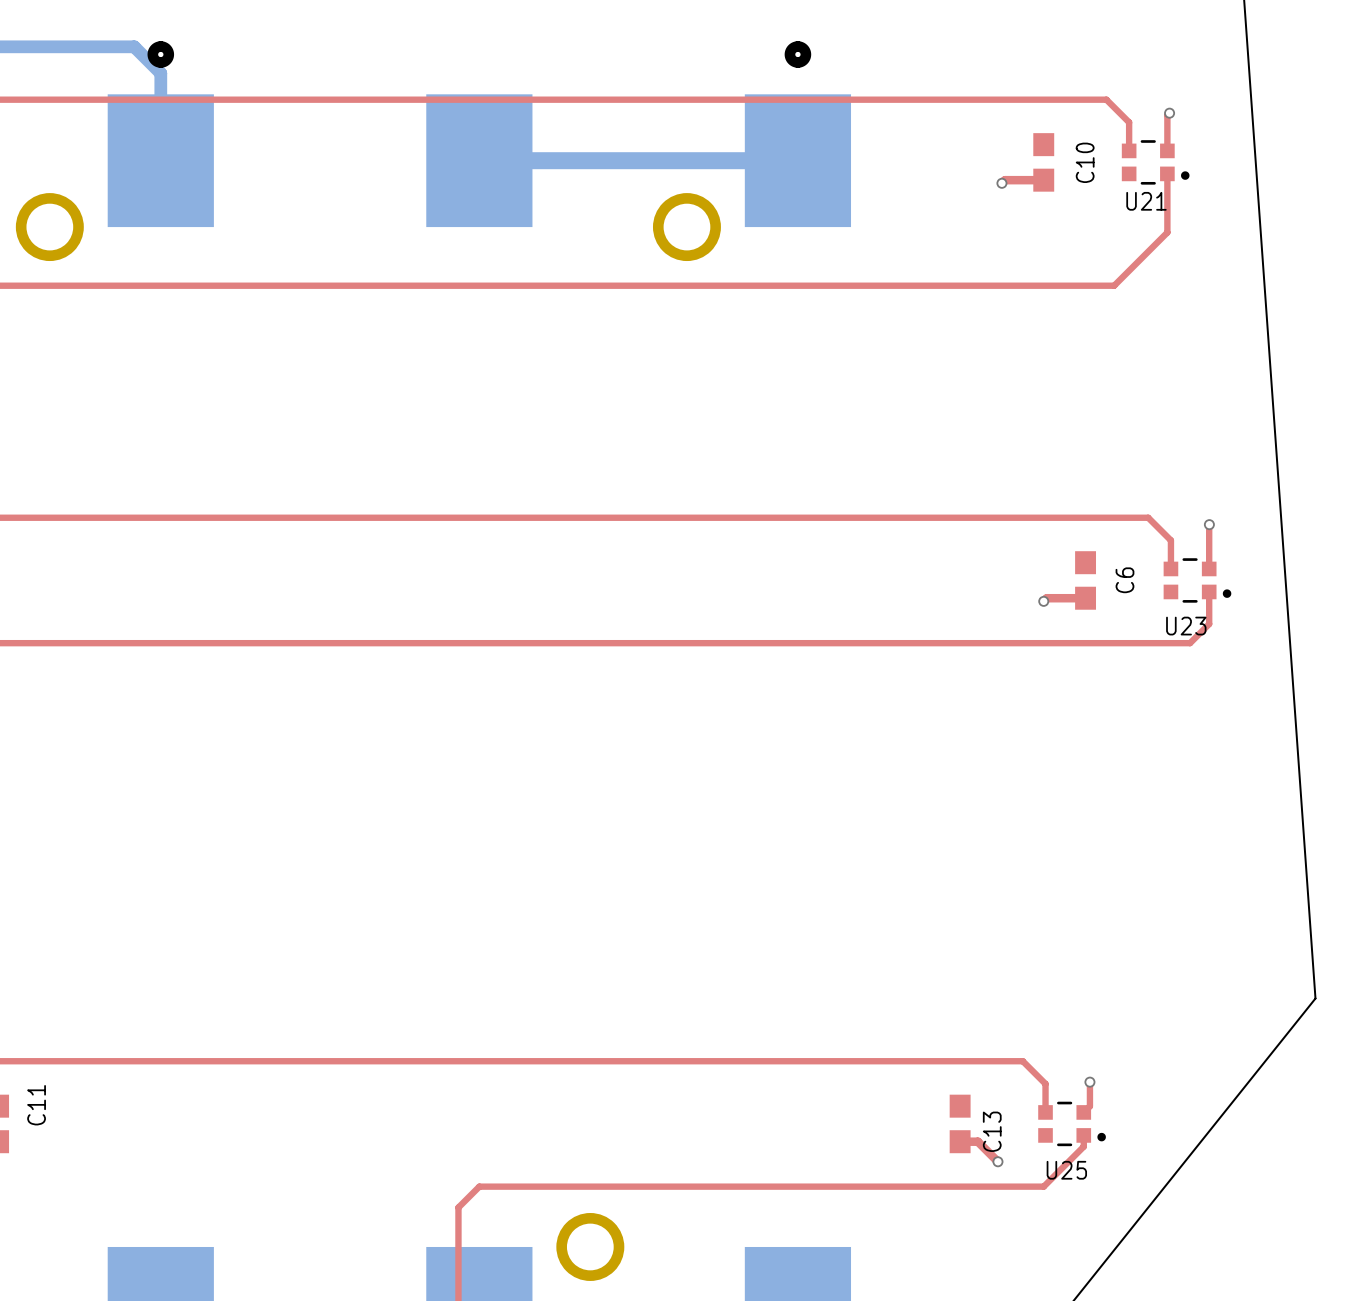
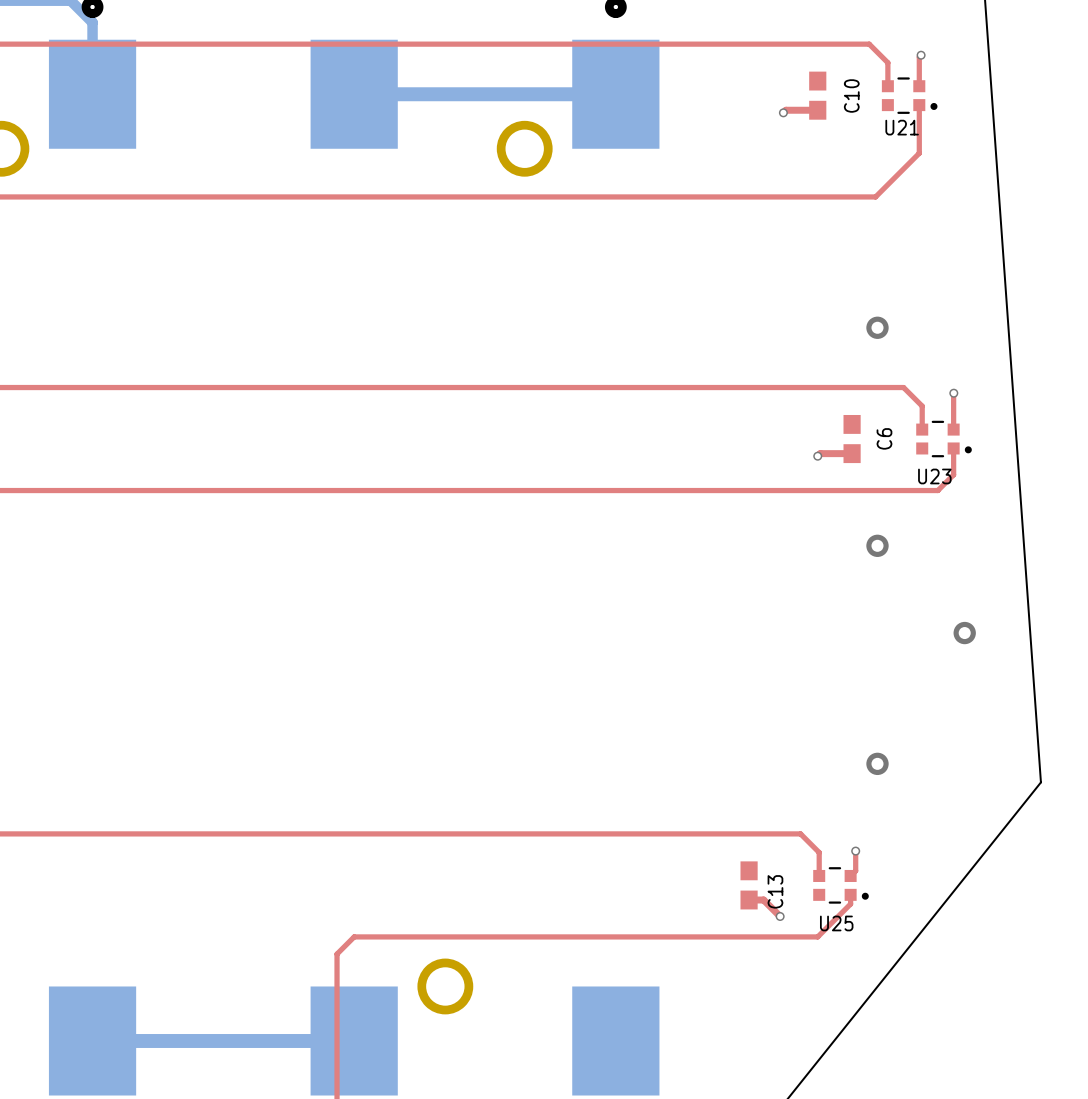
via: none -> (877, 327)
via: none -> (877, 545)
via: none -> (964, 633)
via: none -> (877, 763)

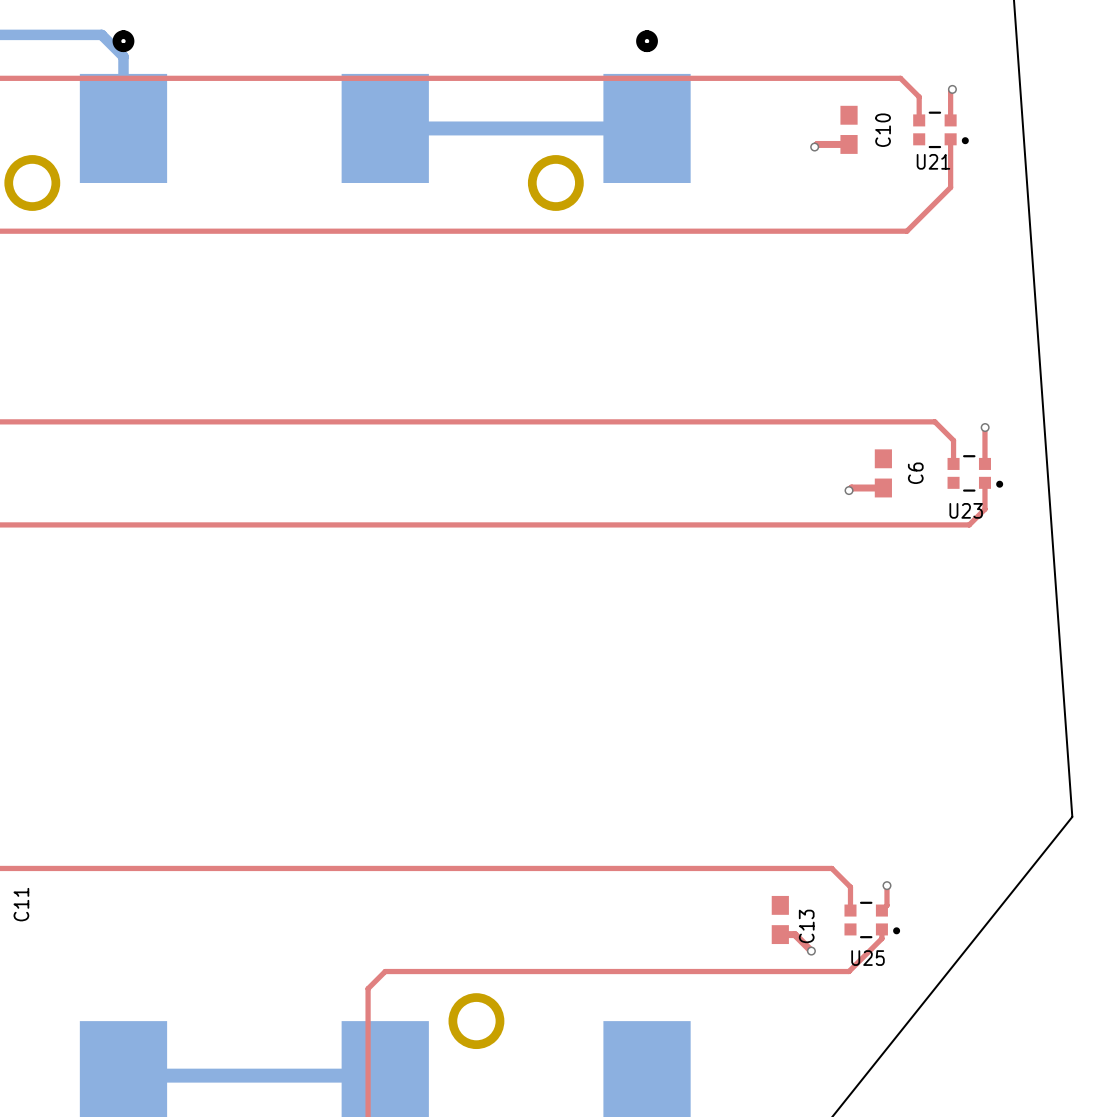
via: (877, 327) -> none
via: (877, 545) -> none
via: (964, 633) -> none
via: (877, 763) -> none

